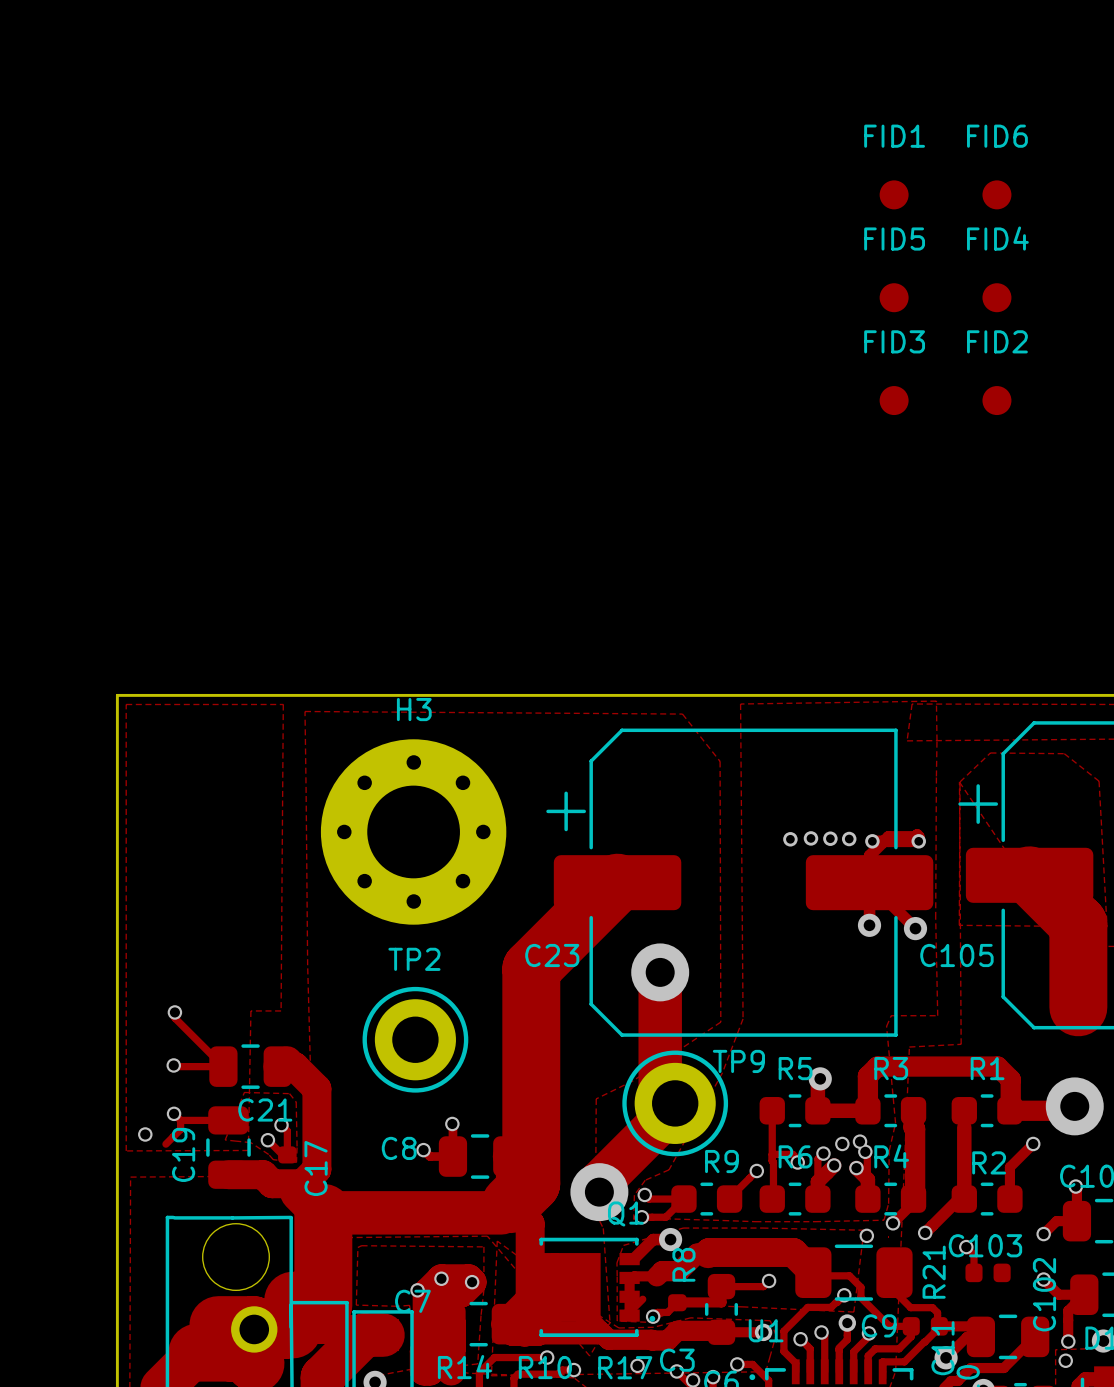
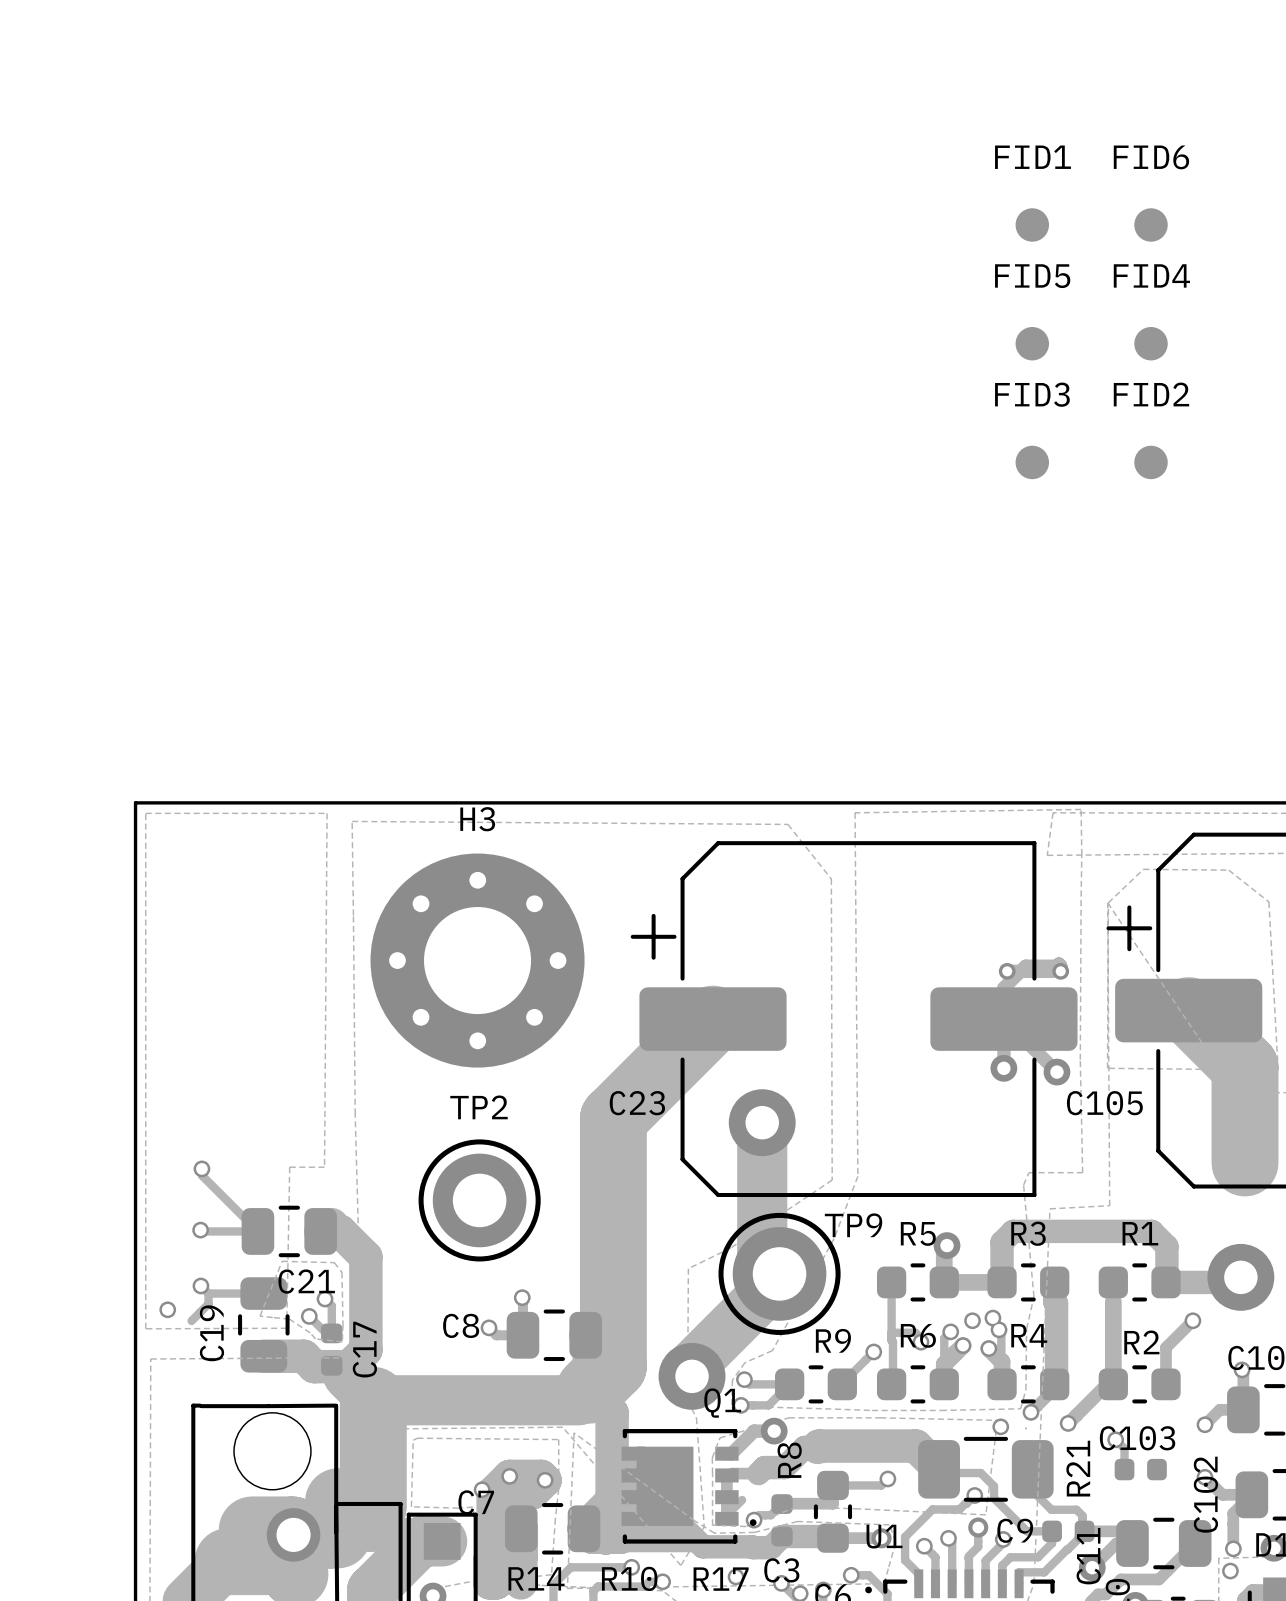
via: (810, 838) -> none
via: (830, 838) -> none
via: (790, 839) -> none
via: (849, 839) -> none

